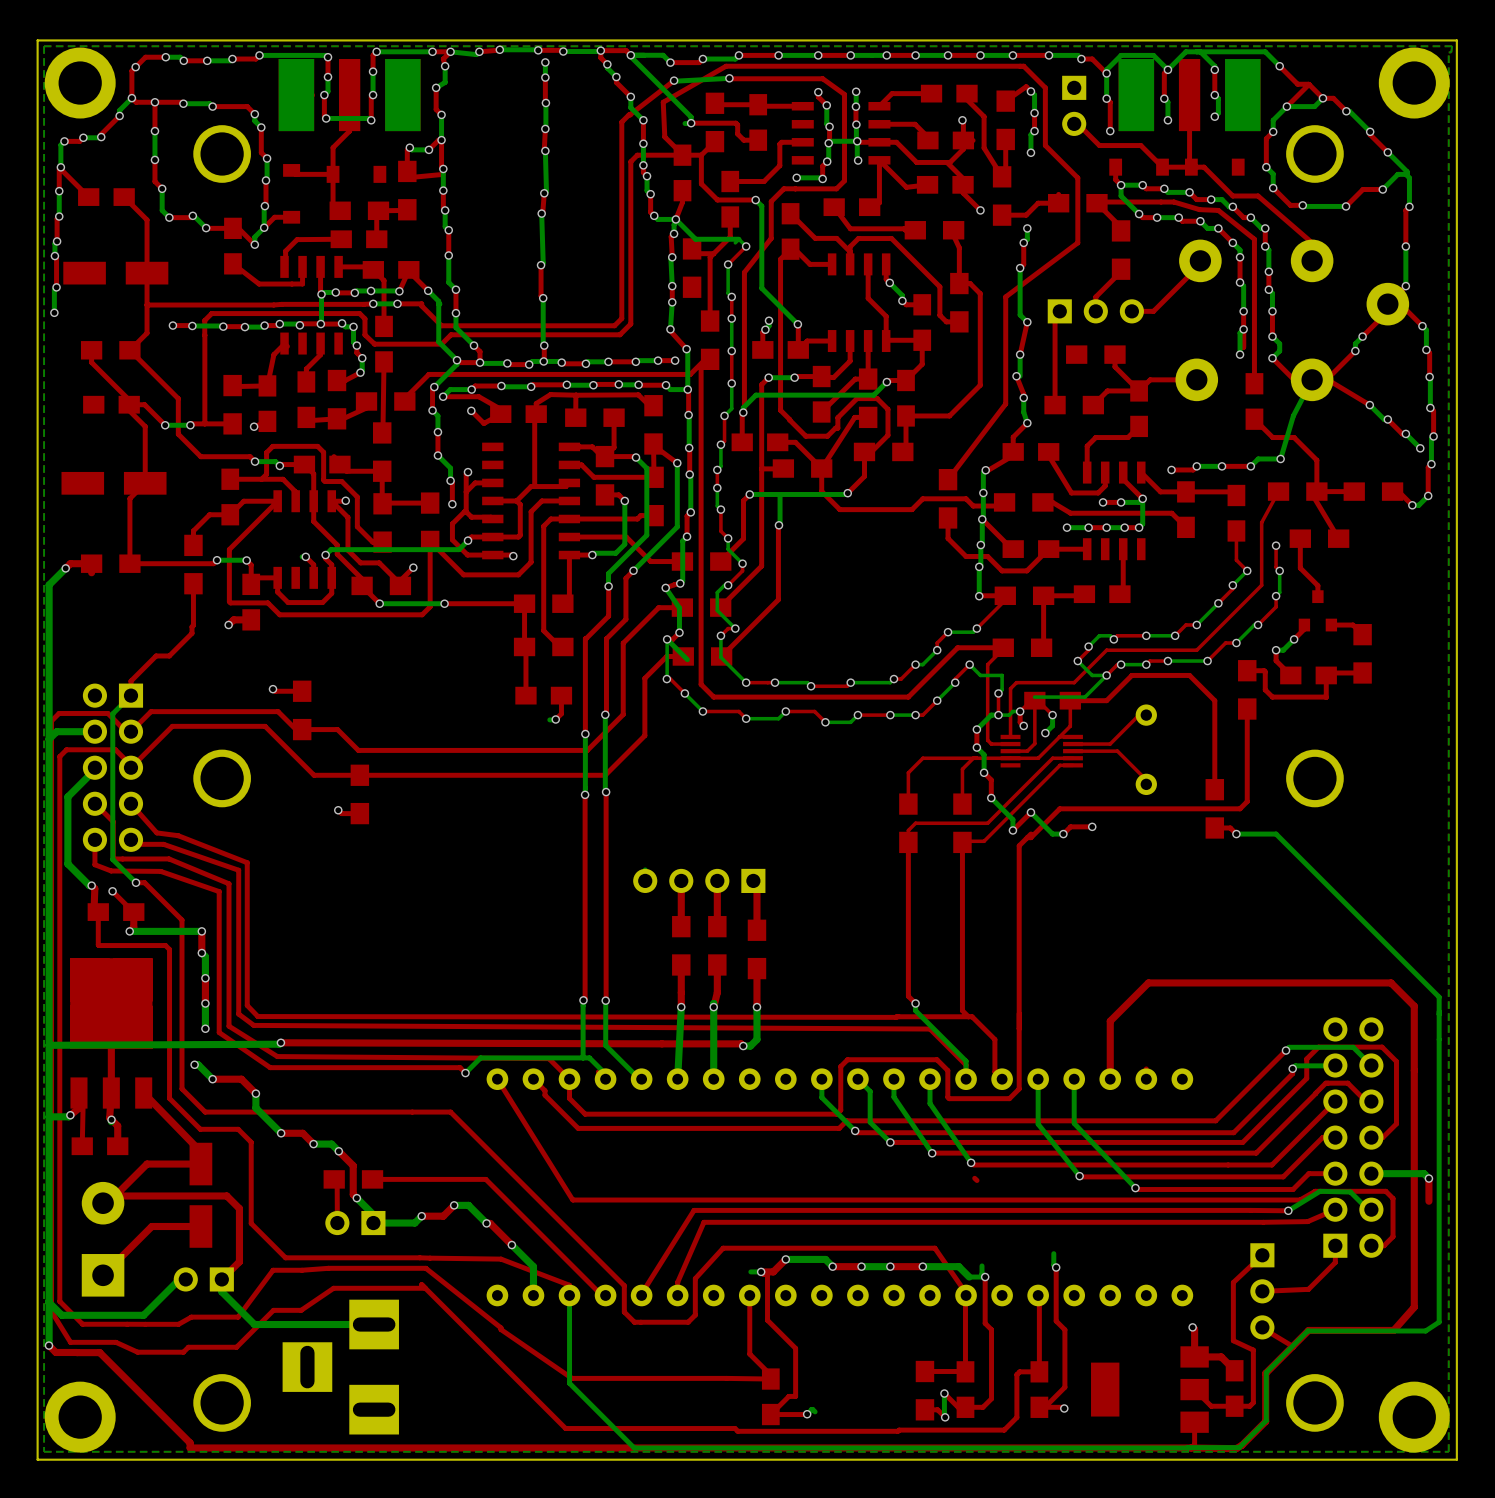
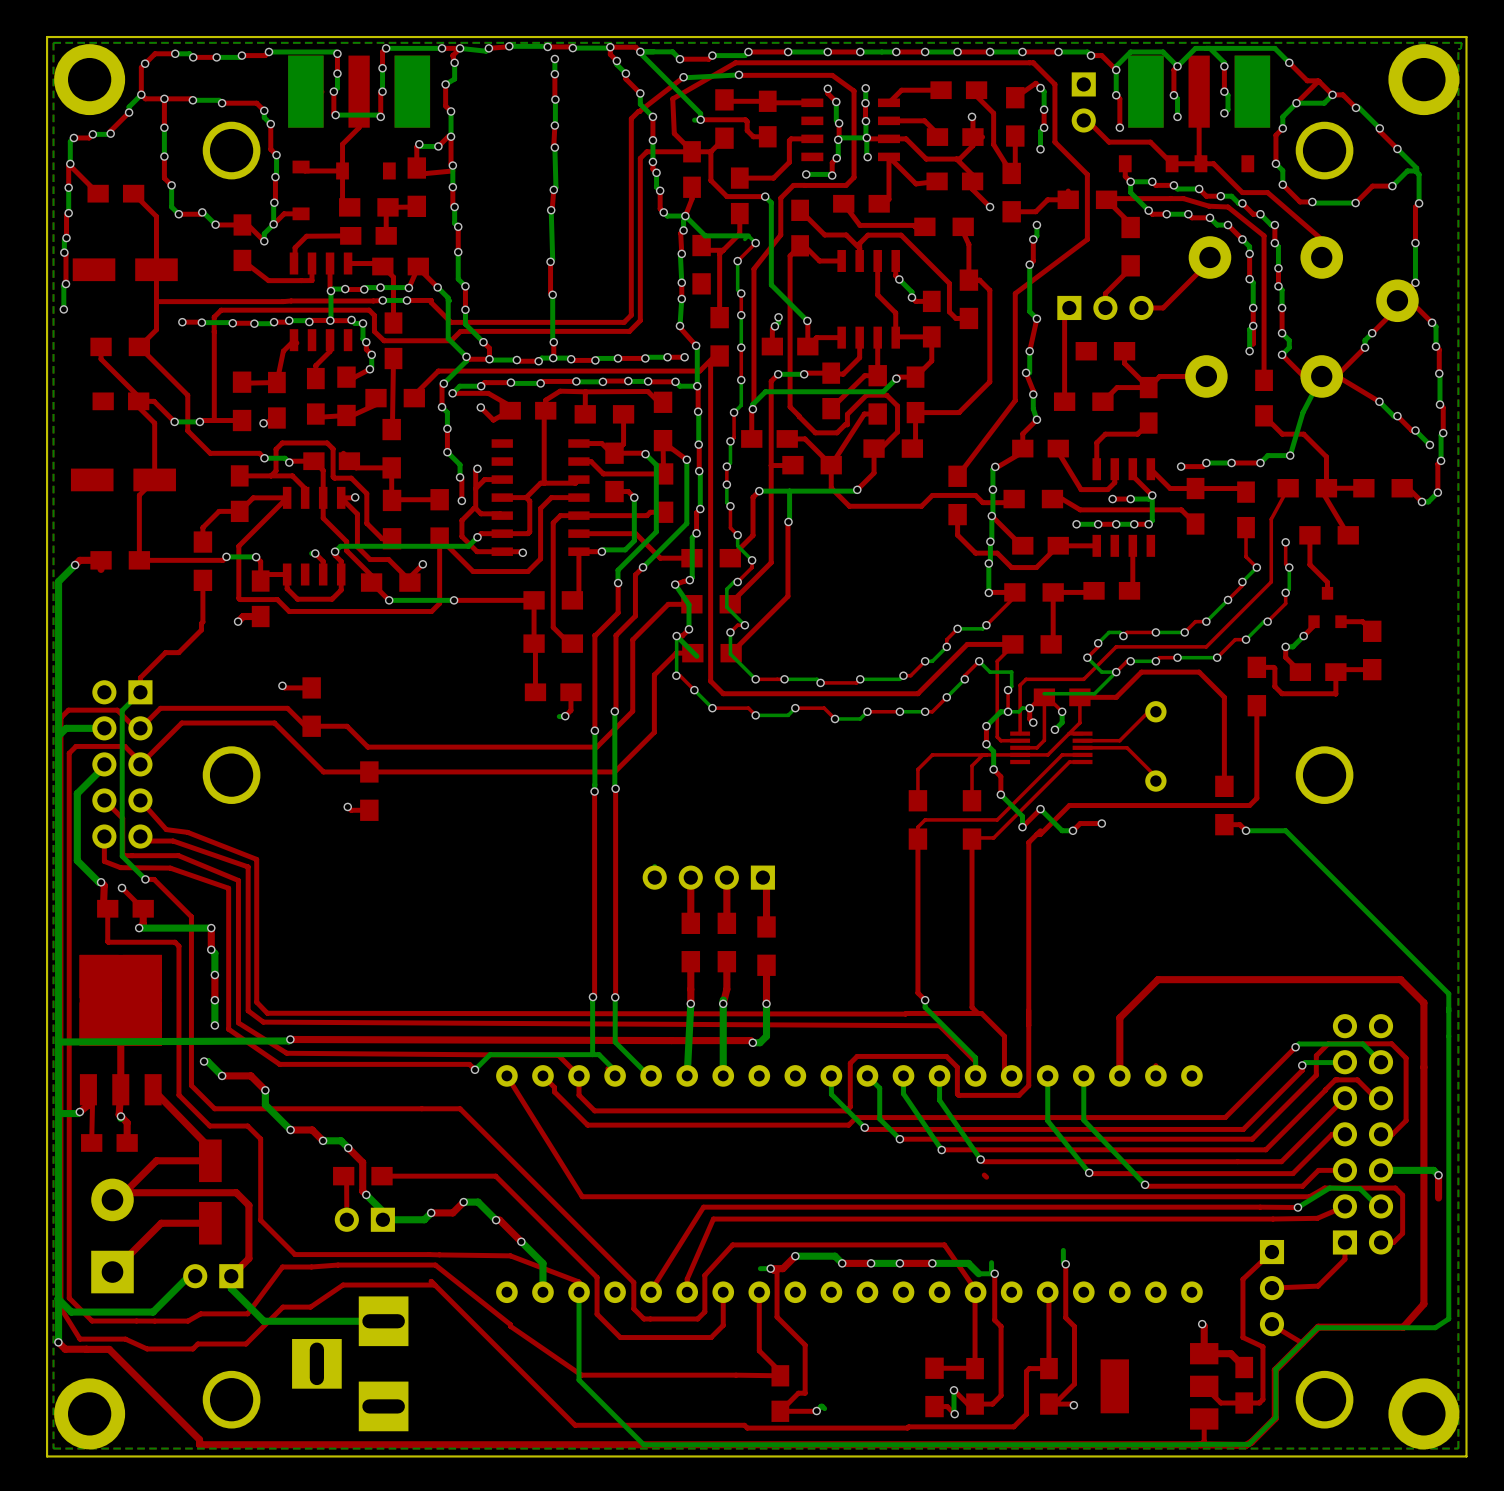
top track: (485, 1179) (601, 1295) (605, 1295) -> (495, 1176) (597, 1277) (597, 1314) (620, 1337) (711, 1337) (723, 1325) (723, 1292)

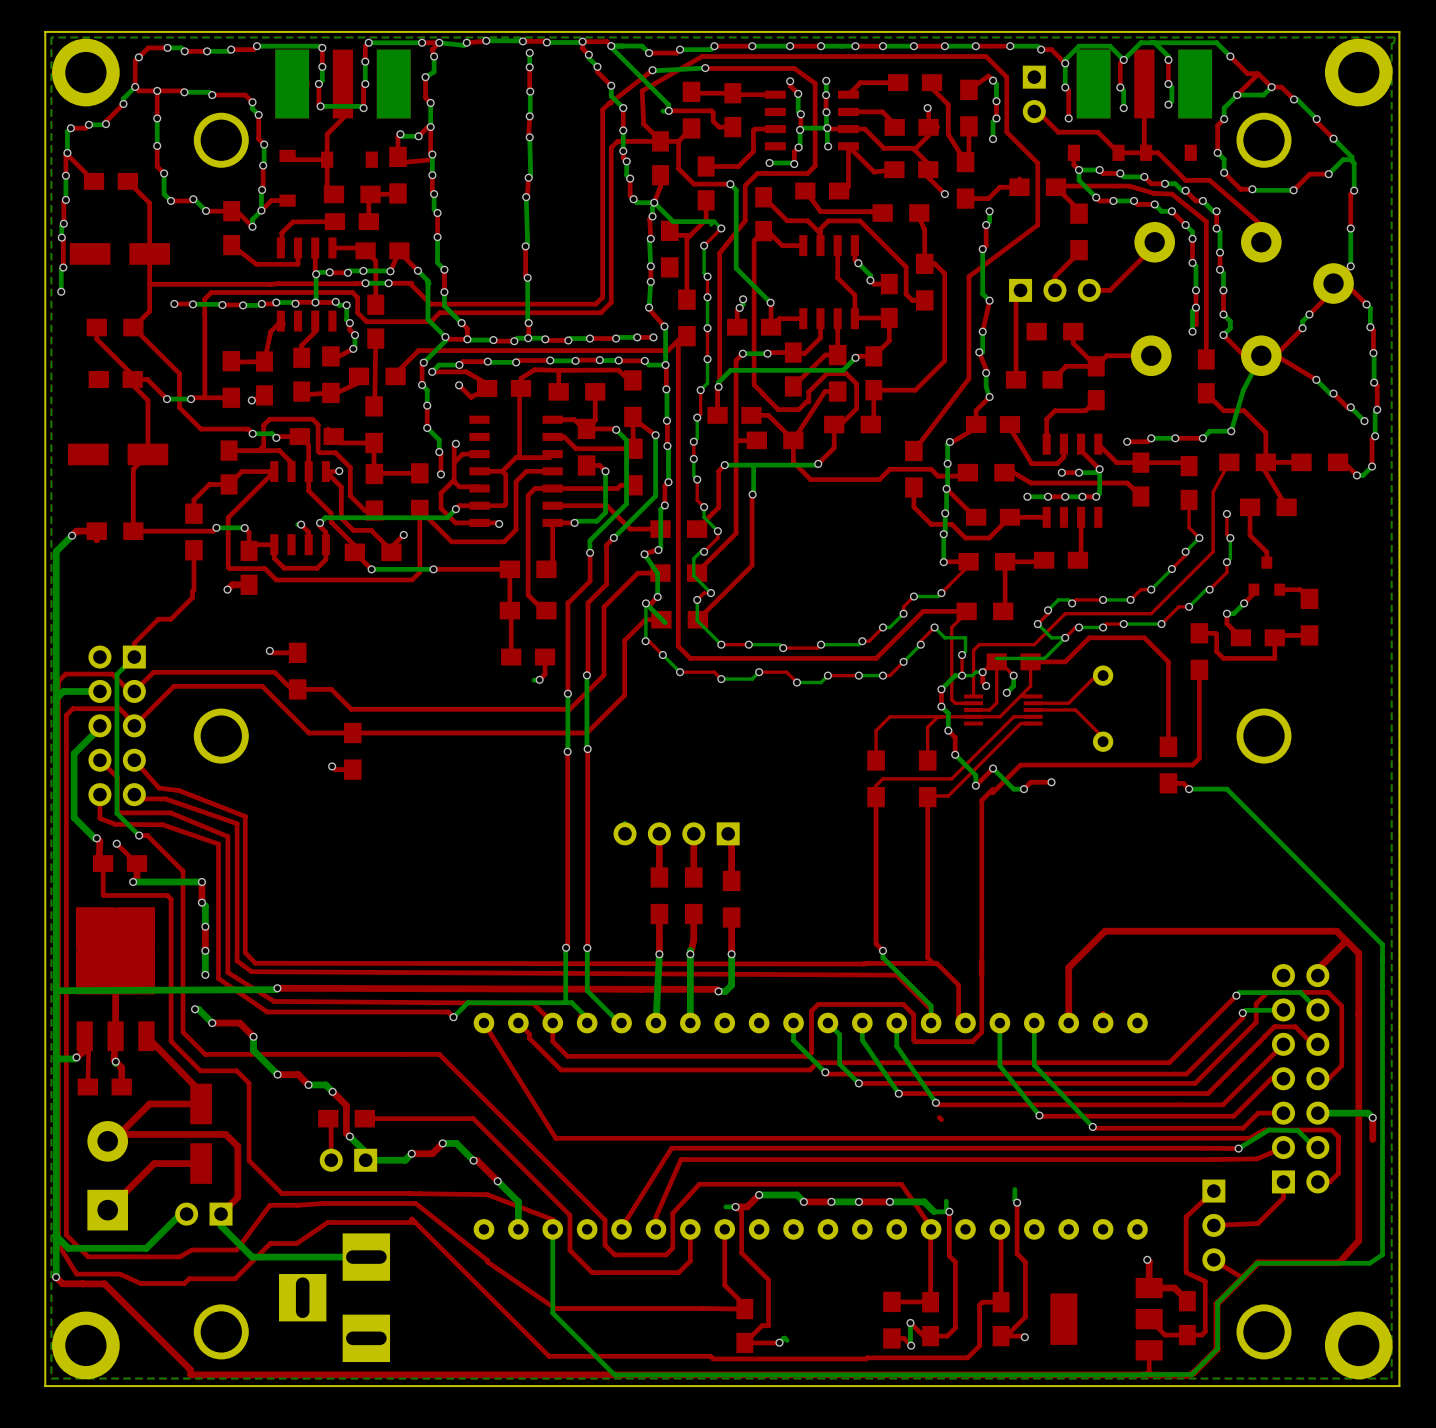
top track: none -> (1346, 940) (1317, 969) (1317, 975)

